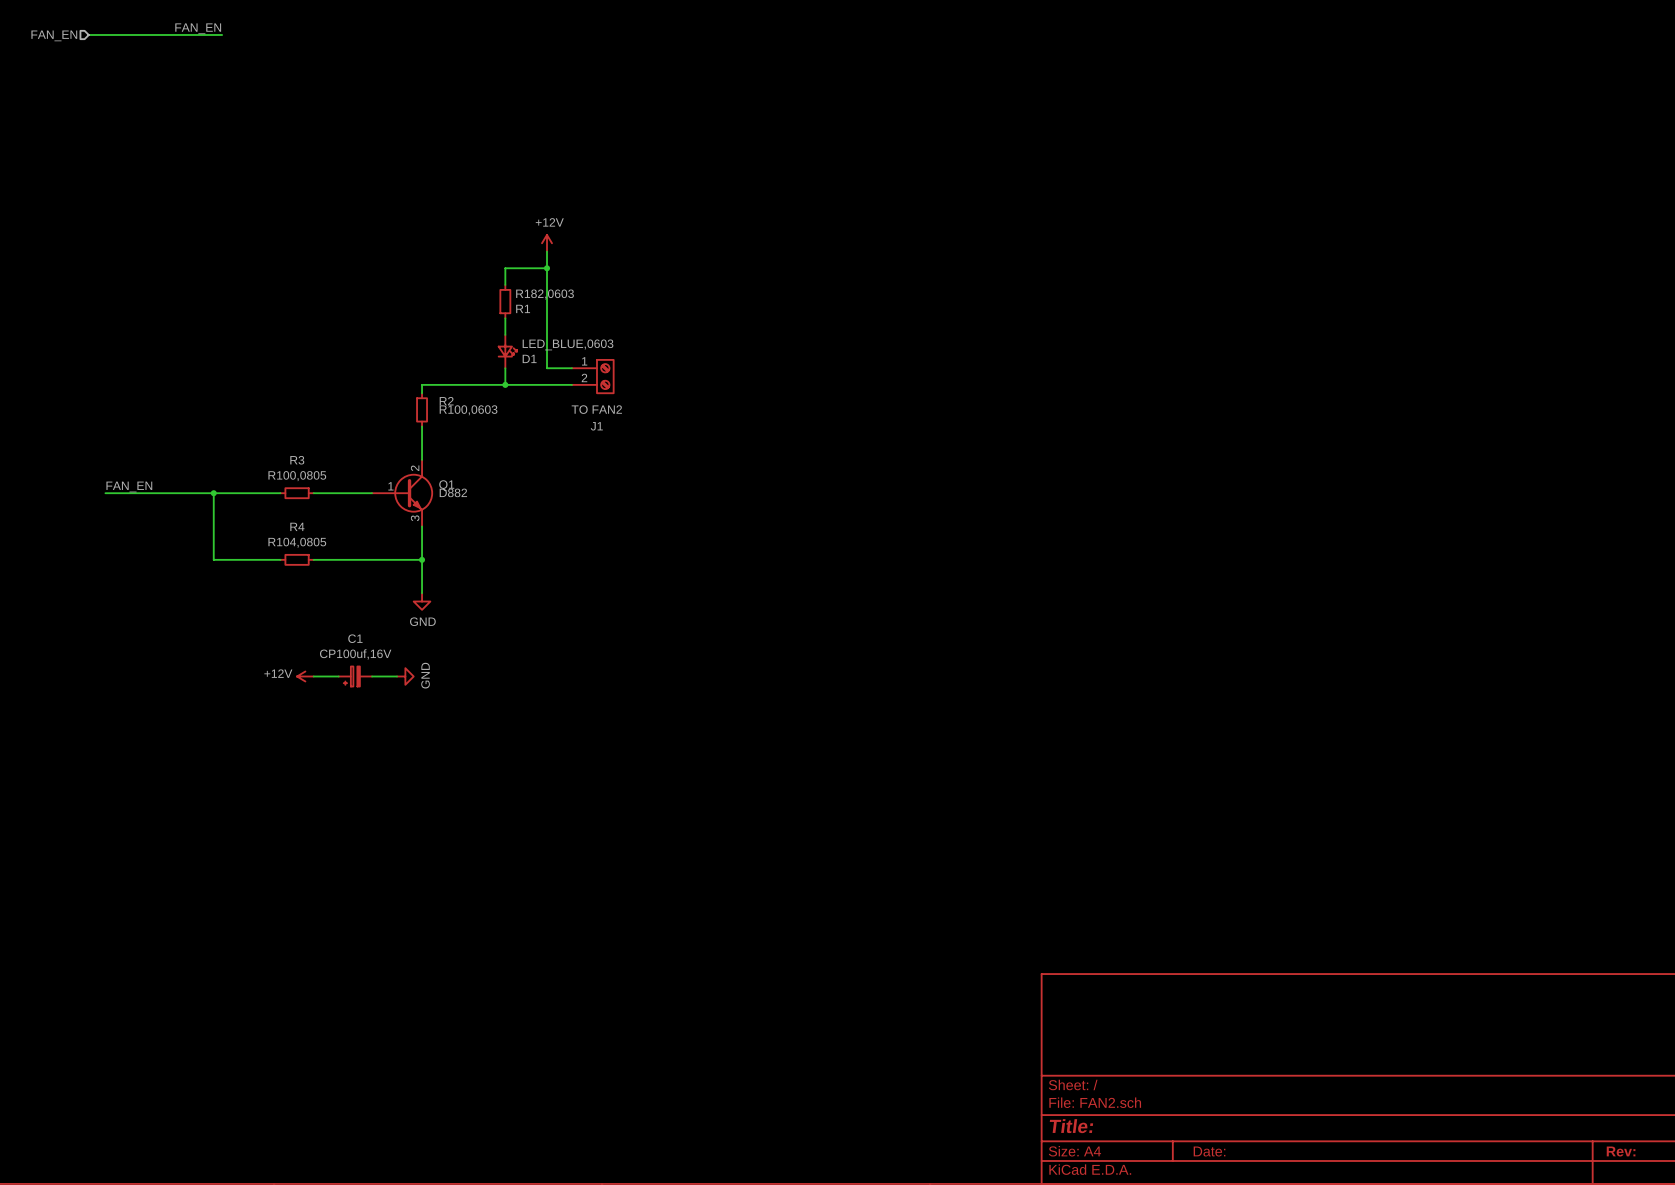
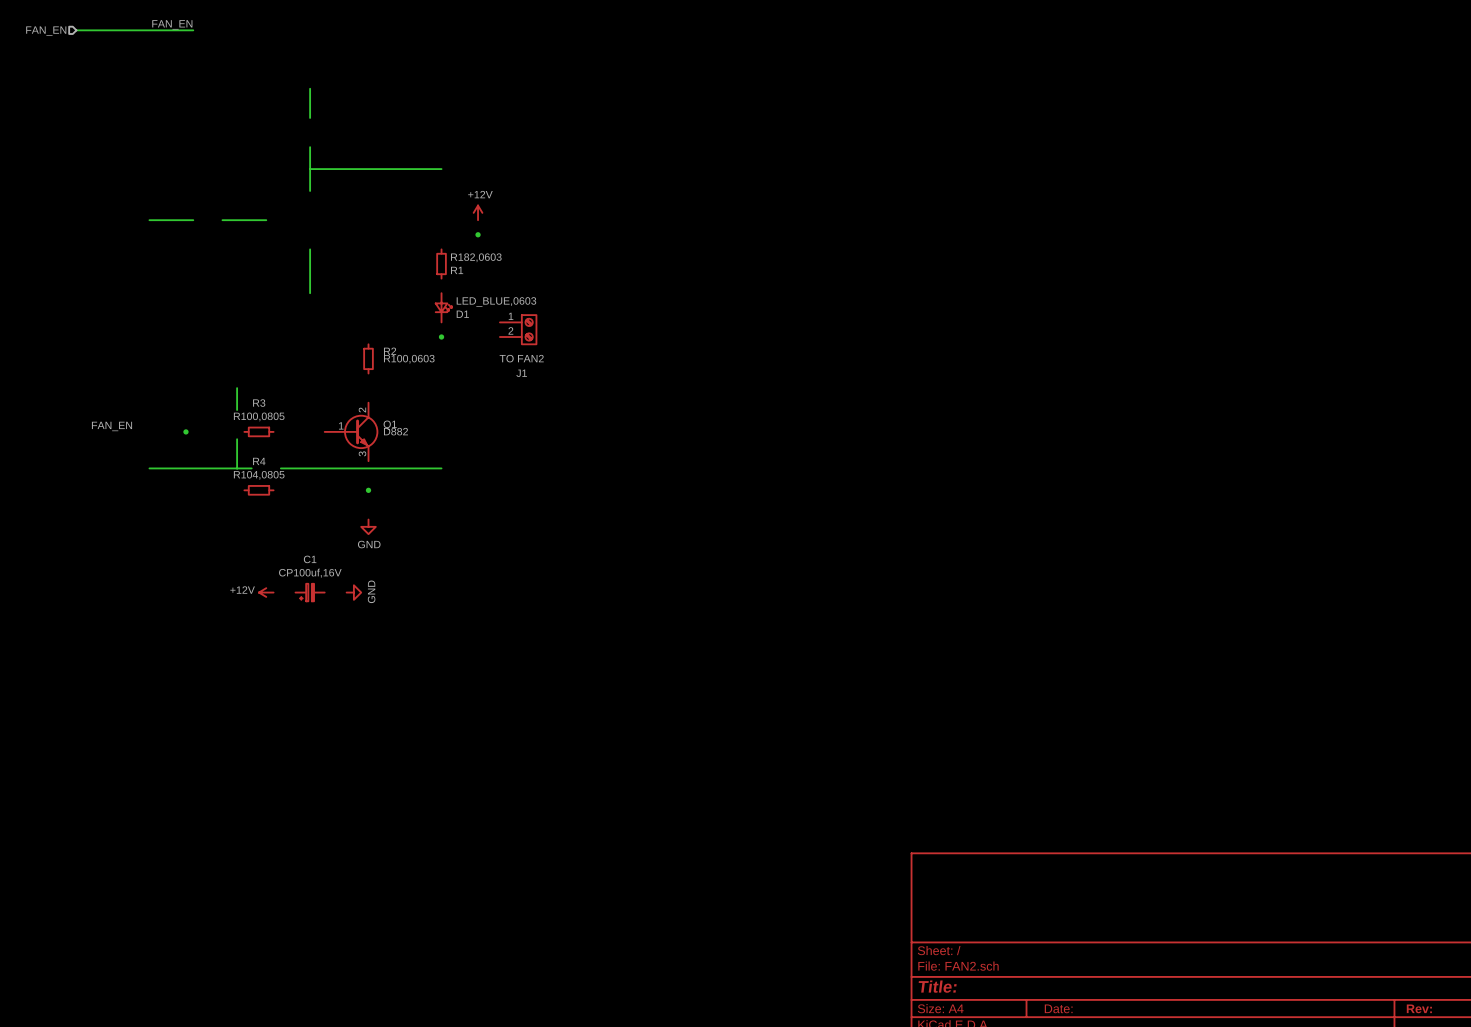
wire: none -> (310, 88) (310, 117)
wire: none -> (310, 147) (310, 190)
wire: none -> (310, 169) (441, 169)
wire: none -> (149, 220) (193, 220)
wire: none -> (222, 220) (266, 220)
wire: (547, 251) (547, 368) (571, 368) -> none
wire: (547, 268) (505, 268) (505, 284) -> none
wire: none -> (310, 249) (310, 293)
wire: (505, 318) (505, 334) -> none
wire: (505, 368) (505, 384) -> none
wire: (571, 384) (422, 384) (422, 393) -> none
wire: (422, 426) (422, 459) -> none
wire: none -> (237, 388) (237, 410)
wire: (105, 493) (280, 493) -> none
wire: (213, 493) (213, 559) (280, 559) -> none
wire: (313, 493) (372, 493) -> none
wire: none -> (237, 439) (237, 468)
wire: (422, 526) (422, 593) -> none
wire: none -> (149, 468) (251, 468)
wire: none -> (280, 468) (441, 468)
wire: (313, 559) (422, 559) -> none
wire: (313, 676) (338, 676) -> none
wire: (372, 676) (397, 676) -> none

